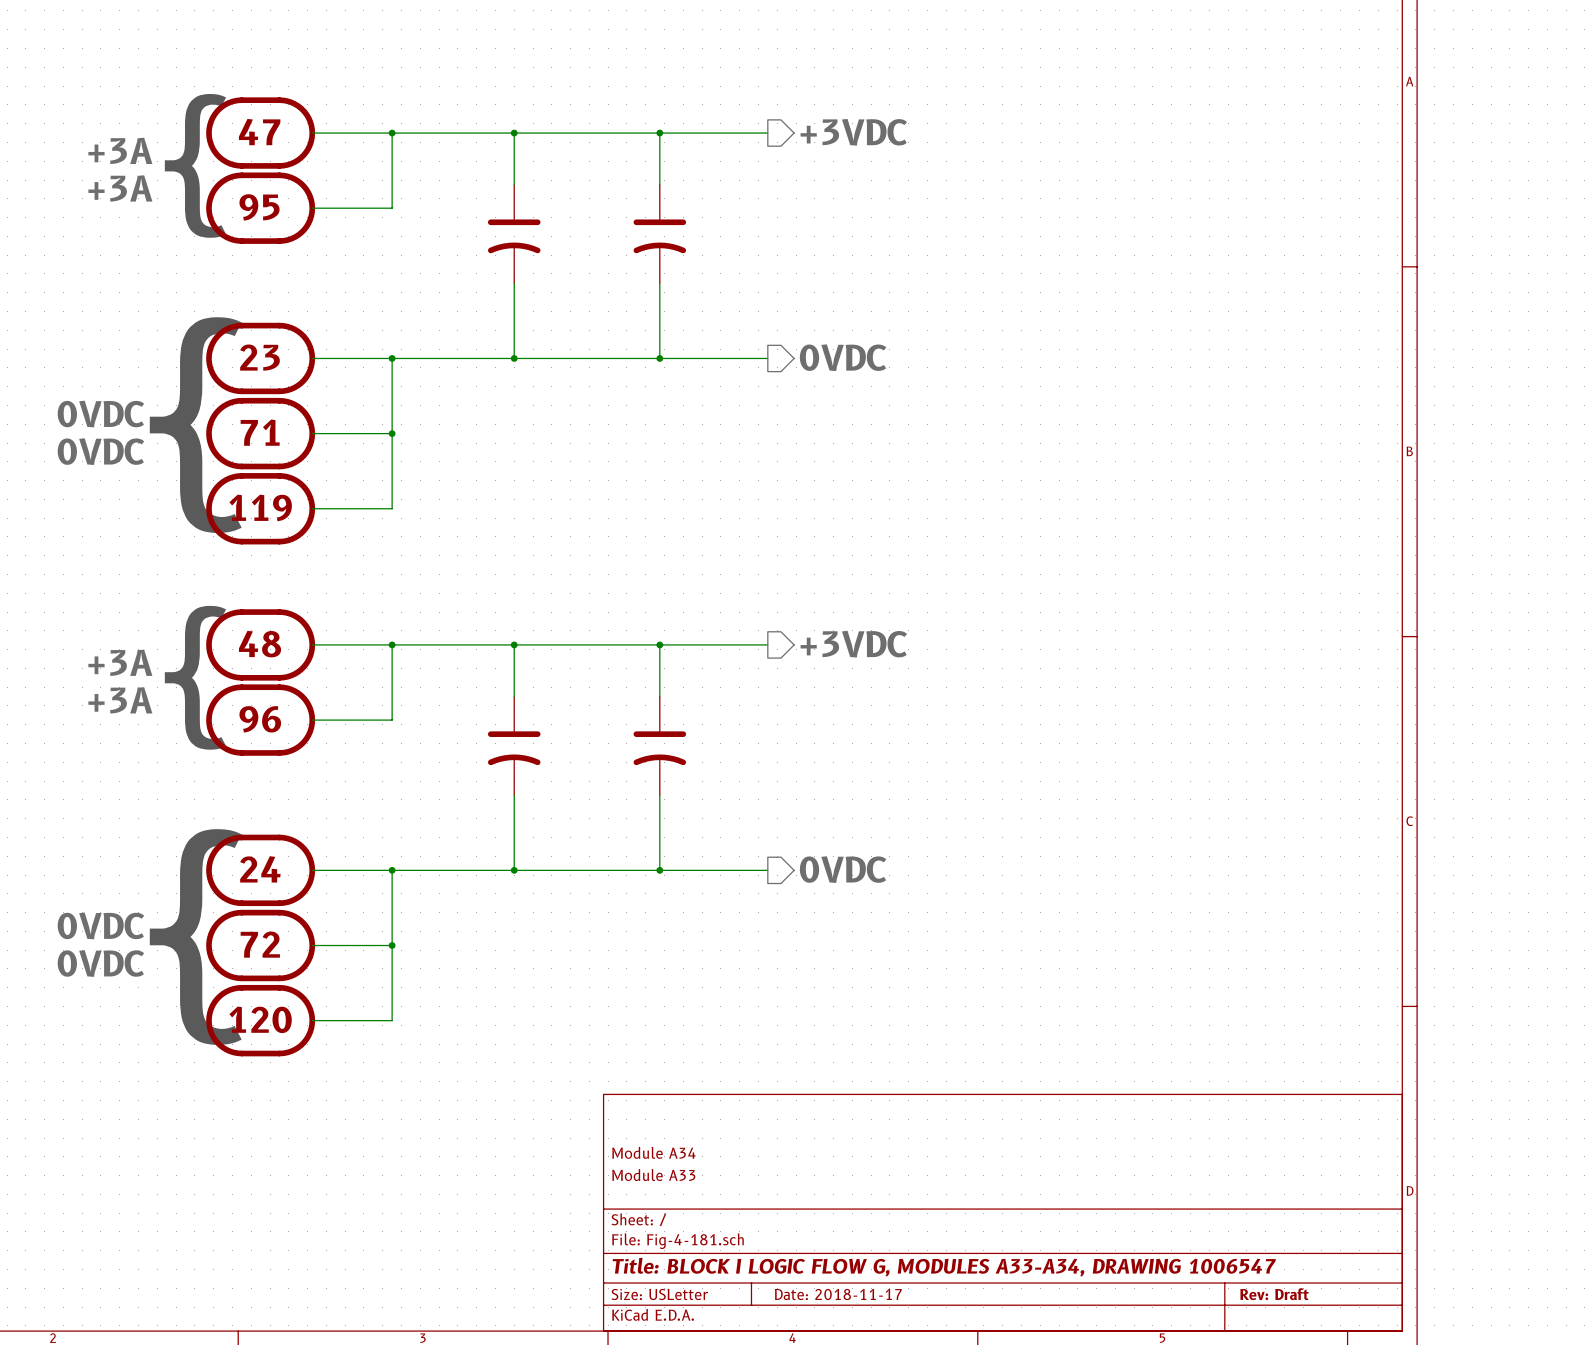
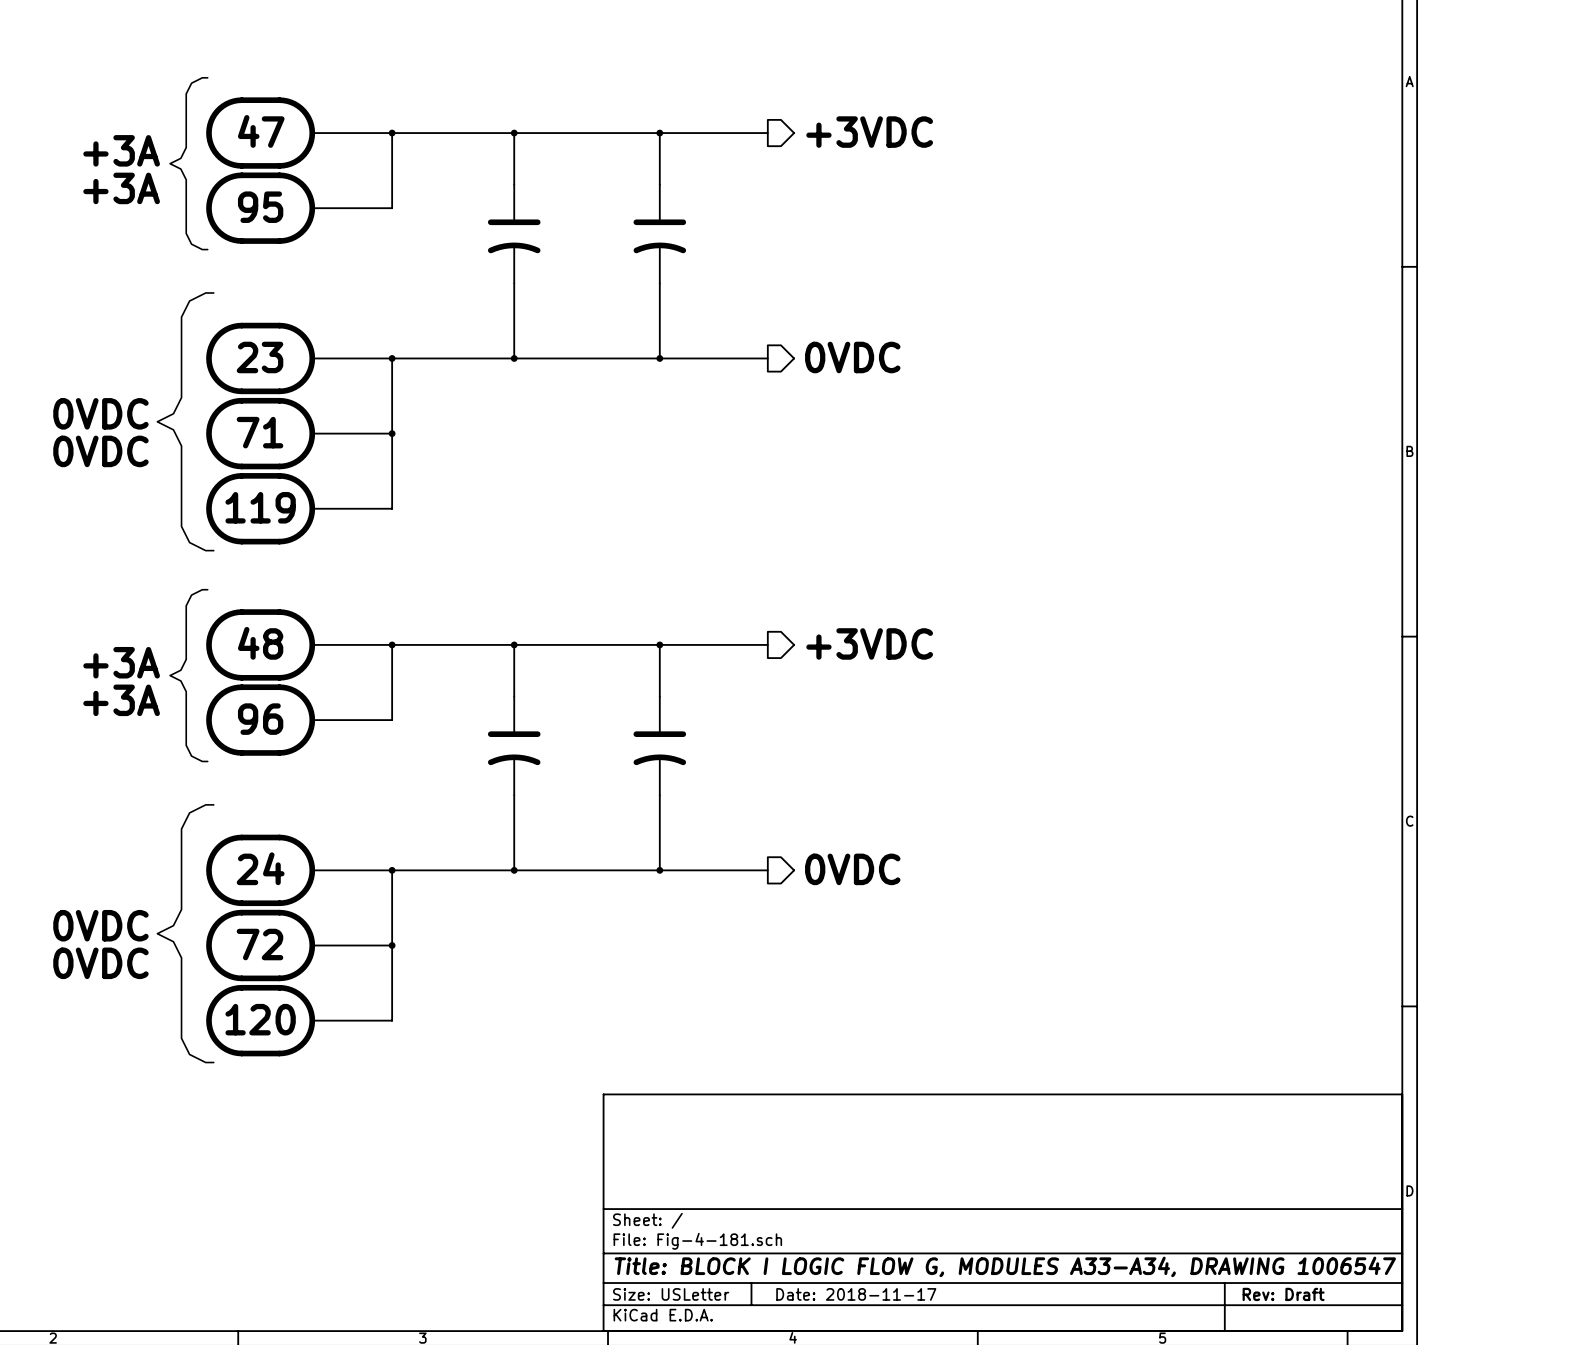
title block: Module A34 (653, 1152) -> none
title block: Module A33 (653, 1175) -> none

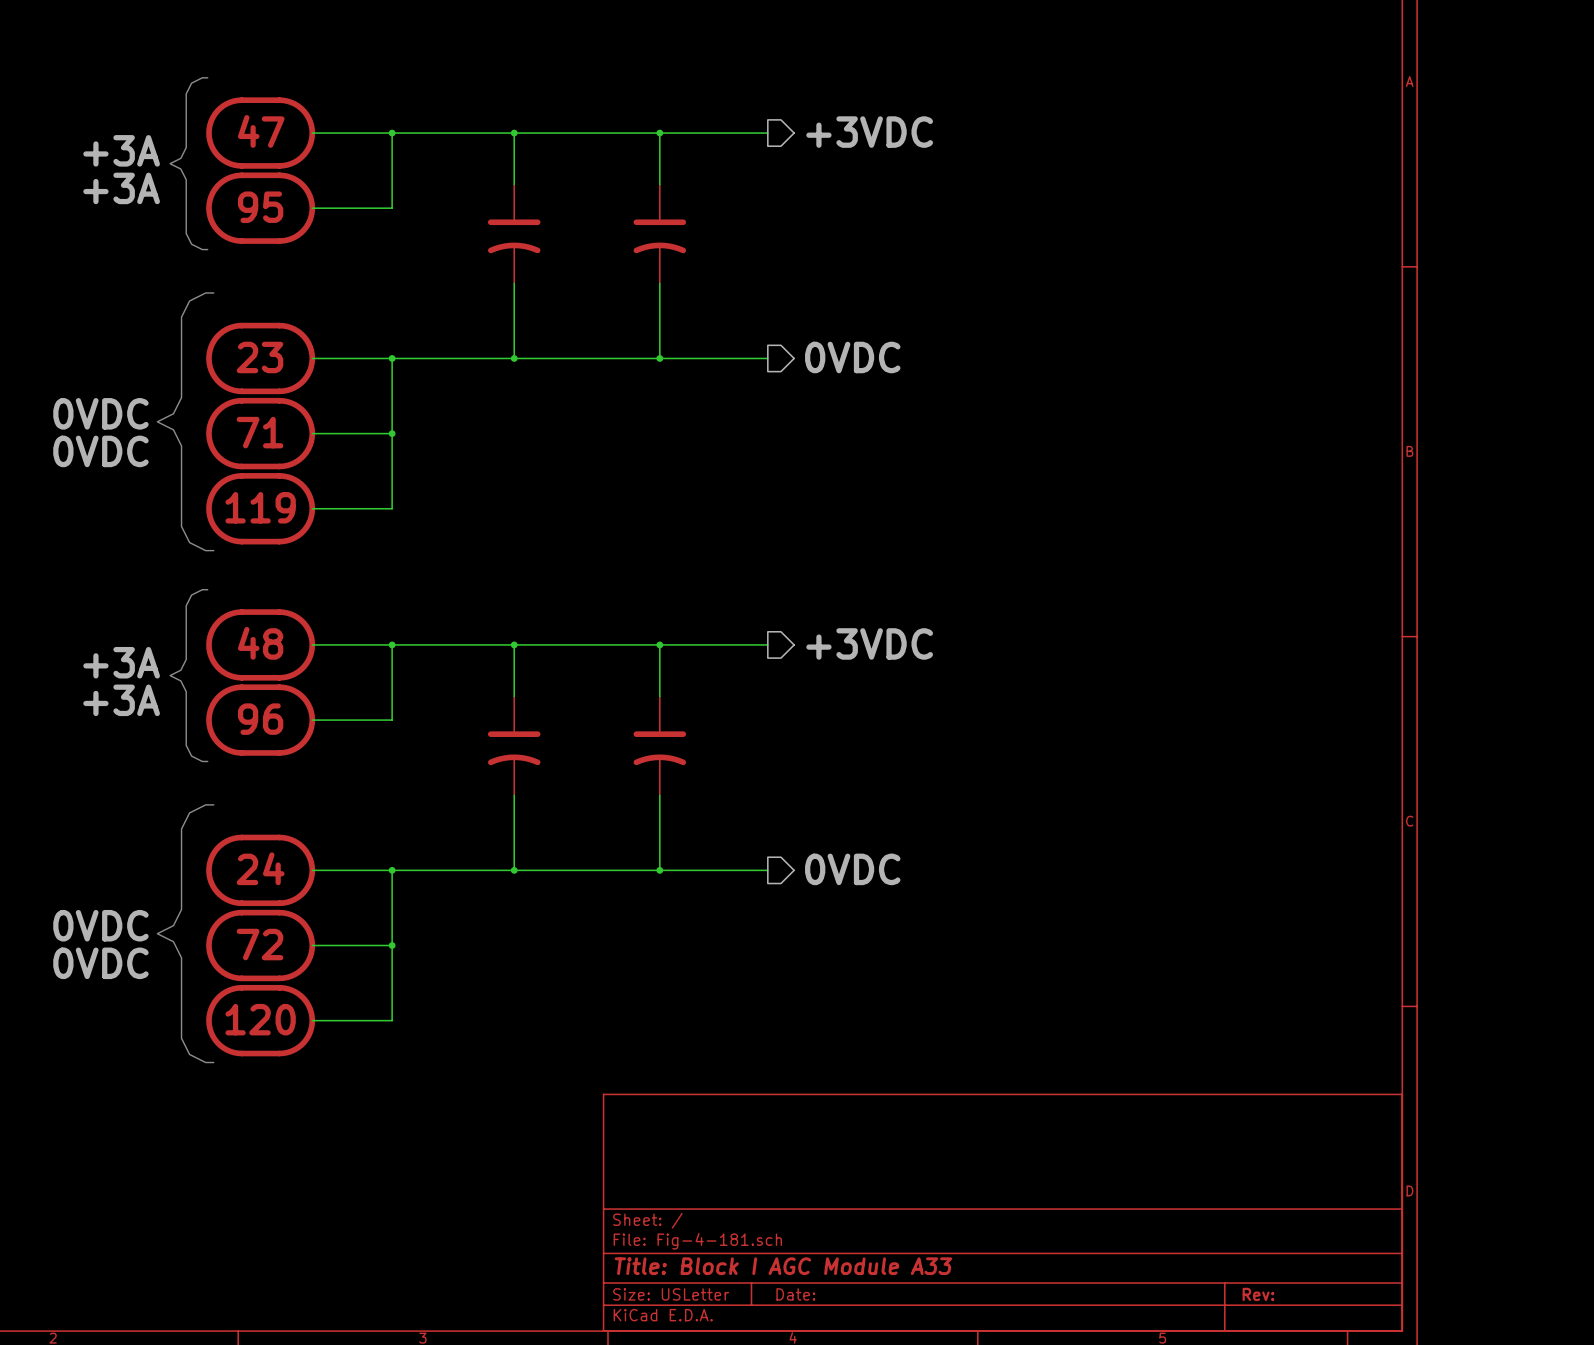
title block: Title: BLOCK I LOGIC FLOW G, MODULES A33-A34, DRAWING 1006547 (1005, 1266) -> Title: Block I AGC Module A33 (783, 1266)
title block: Date: 2018-11-17 (856, 1294) -> Date: (795, 1294)
title block: Rev: Draft (1283, 1294) -> Rev: (1258, 1294)

